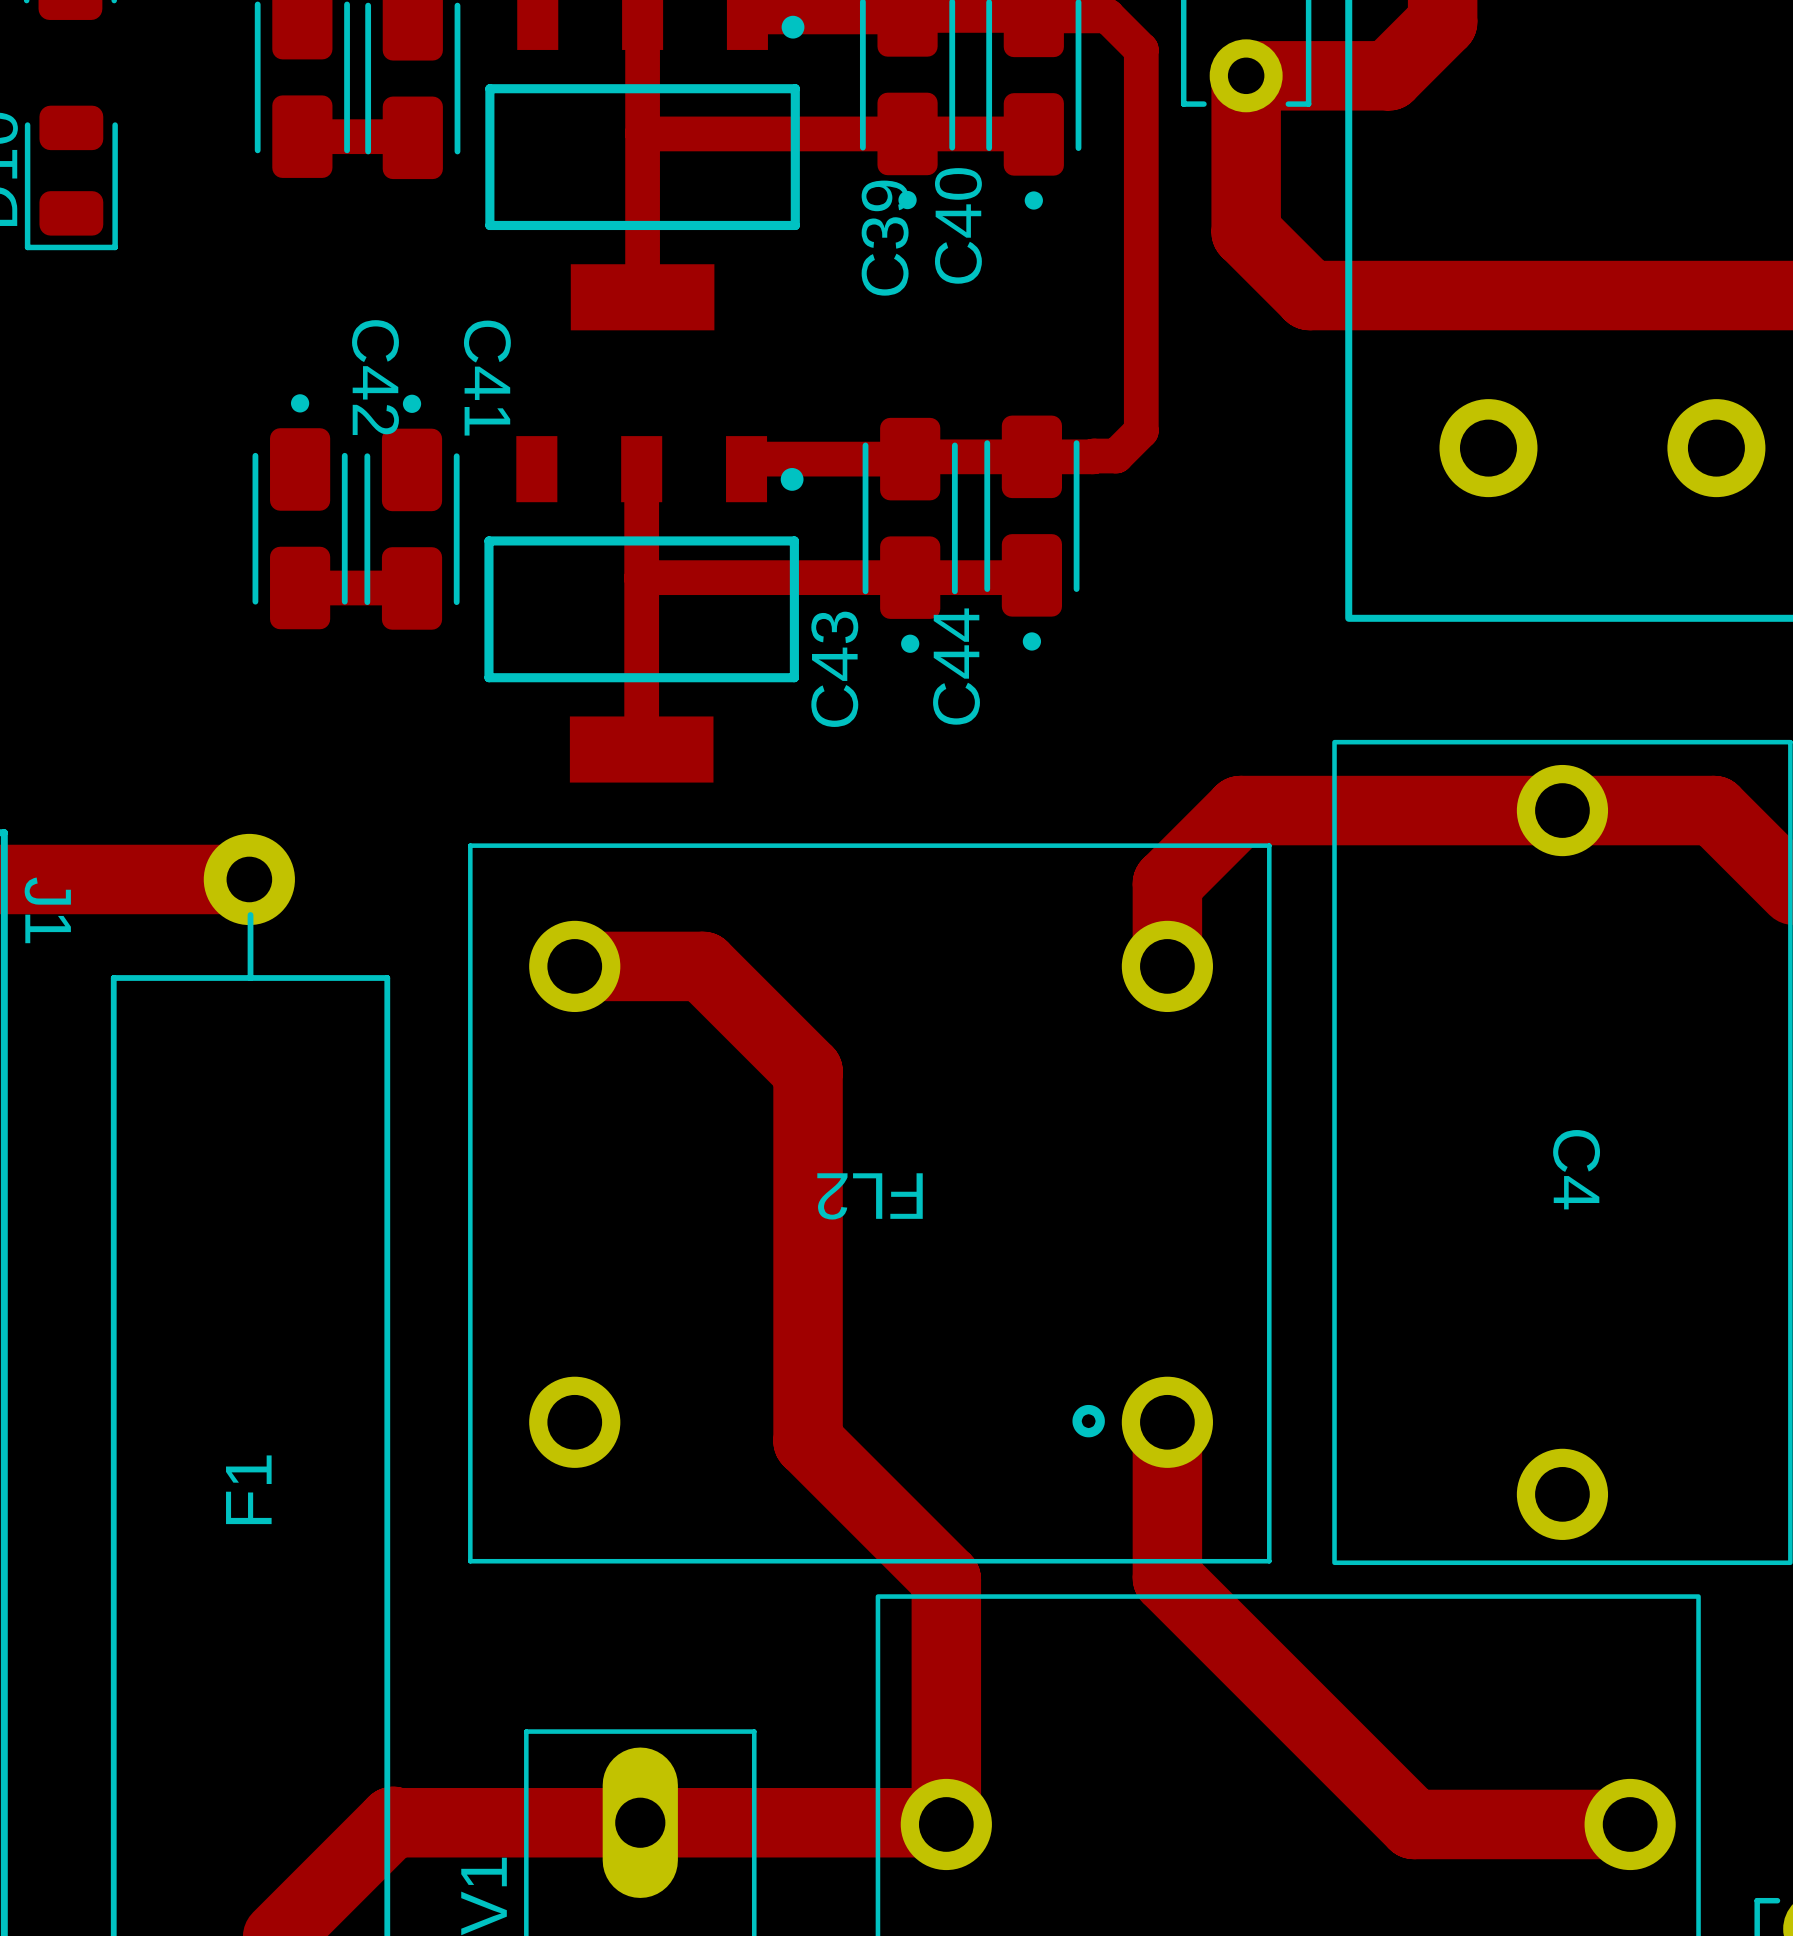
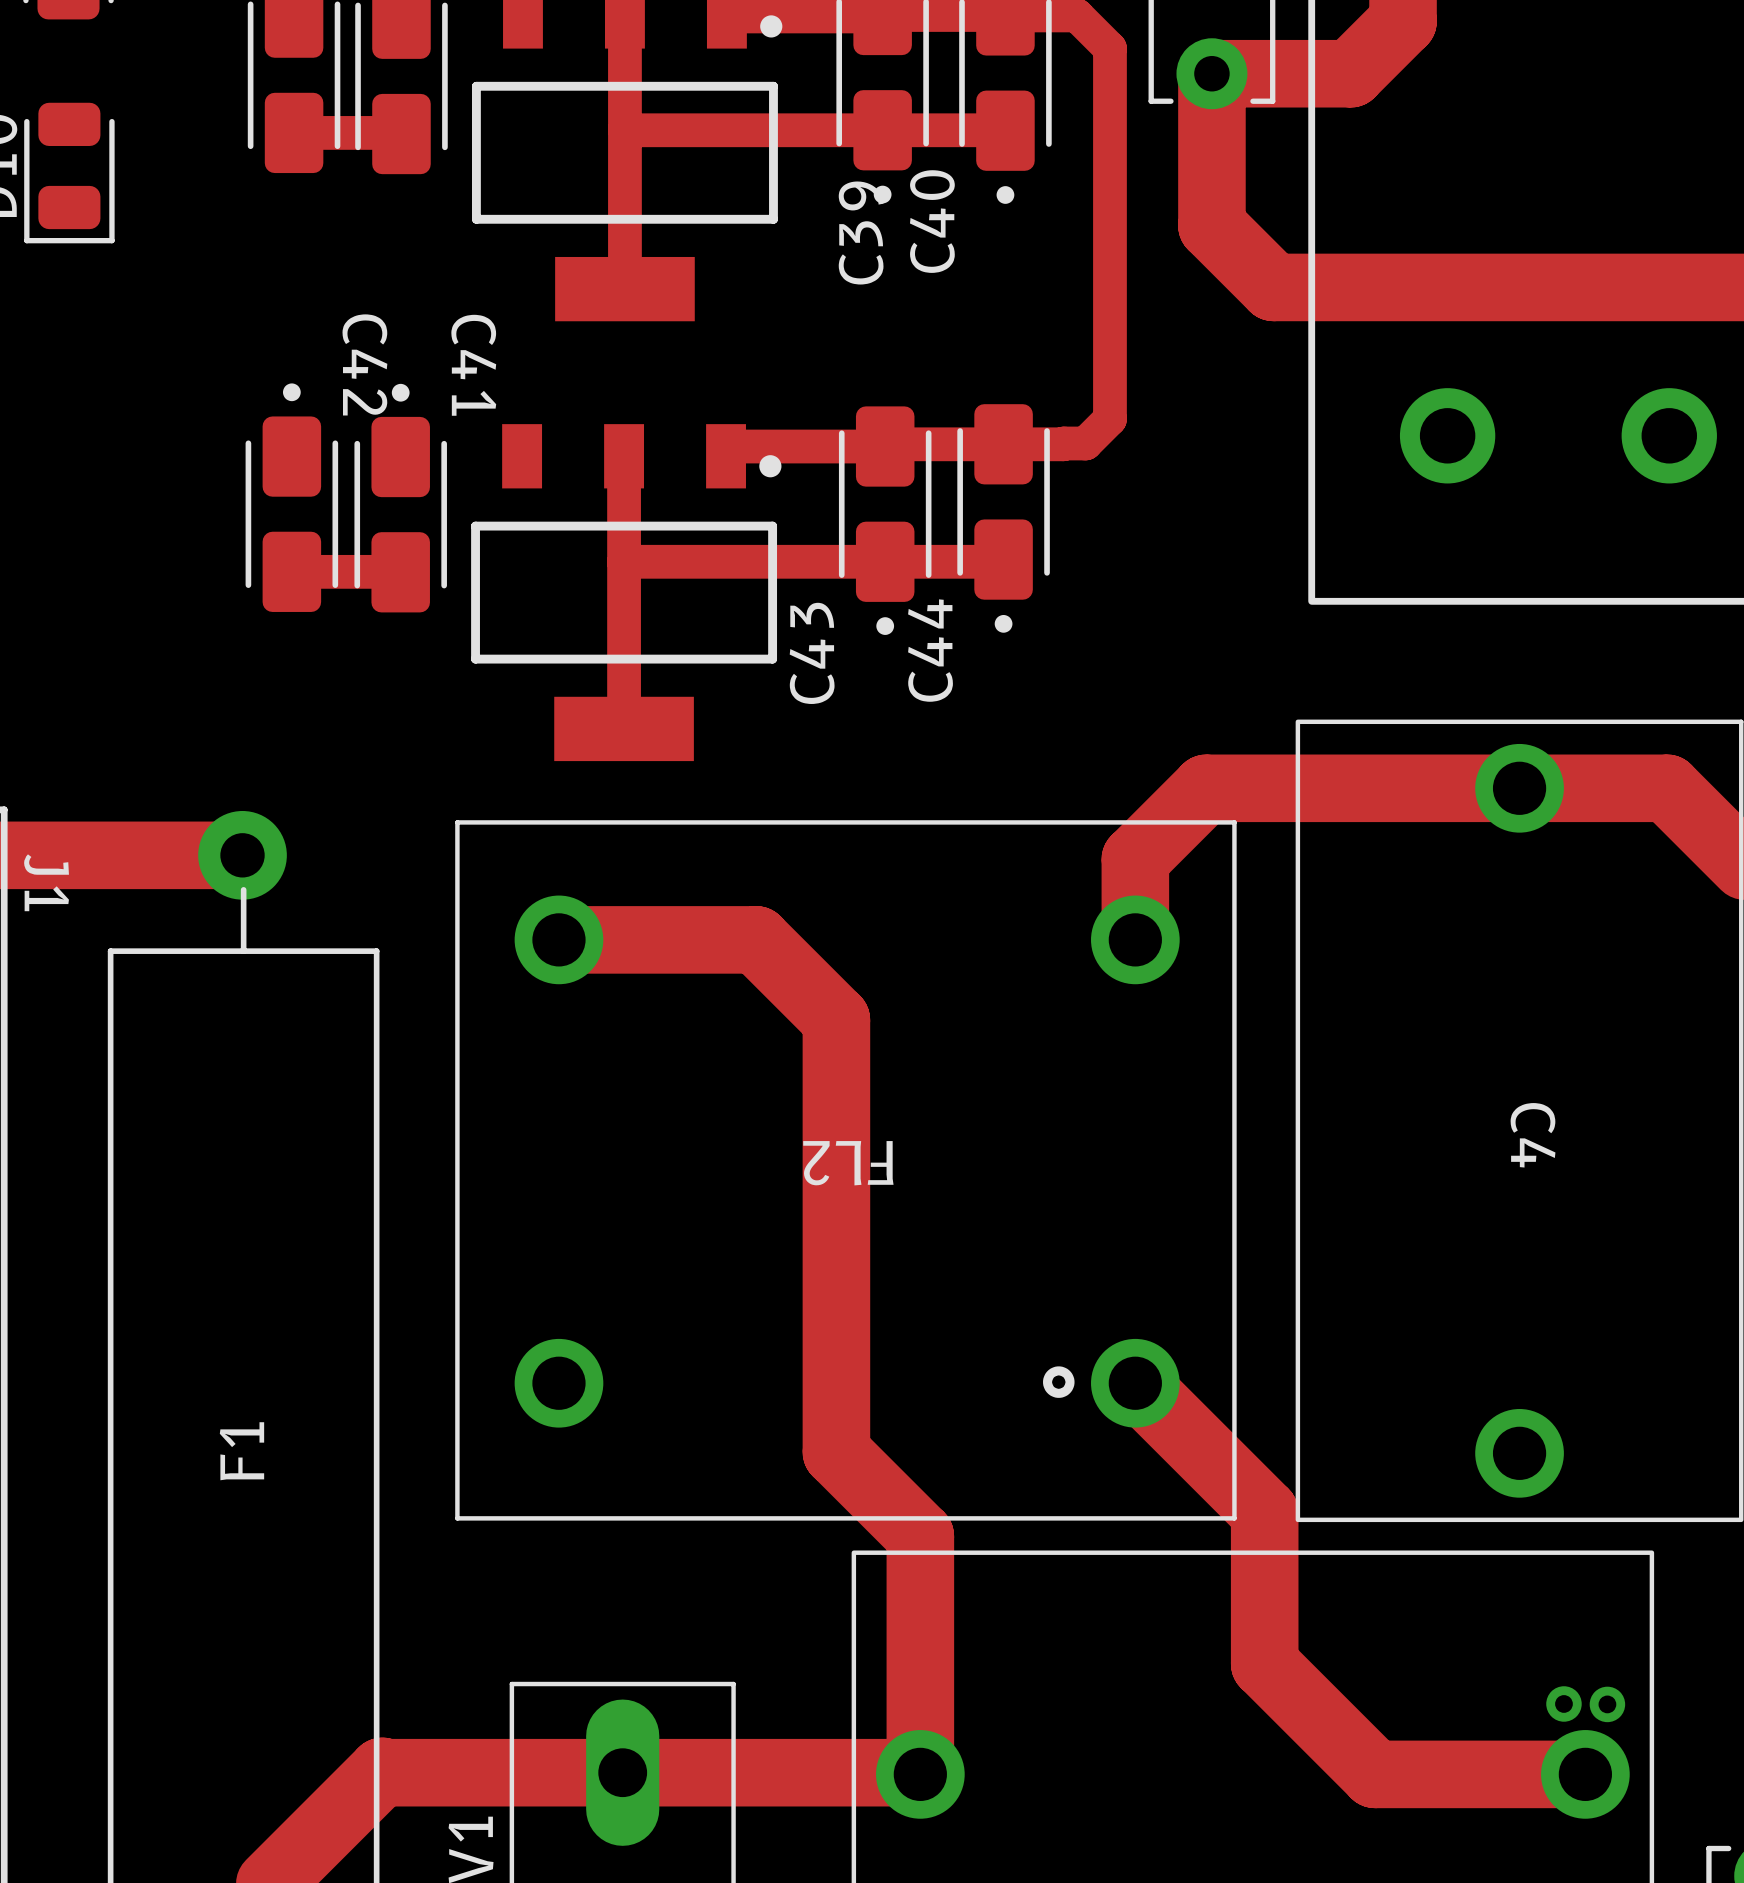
track: (703, 966) (808, 1071) (808, 1441) (860, 1493) -> (683, 939) (756, 939) (836, 1019) (836, 1452)
track: (1167, 1422) (1167, 1578) (1300, 1711) -> (1135, 1383) (1264, 1512) (1264, 1664)
via: none -> (1563, 1703)
via: none -> (1607, 1704)

